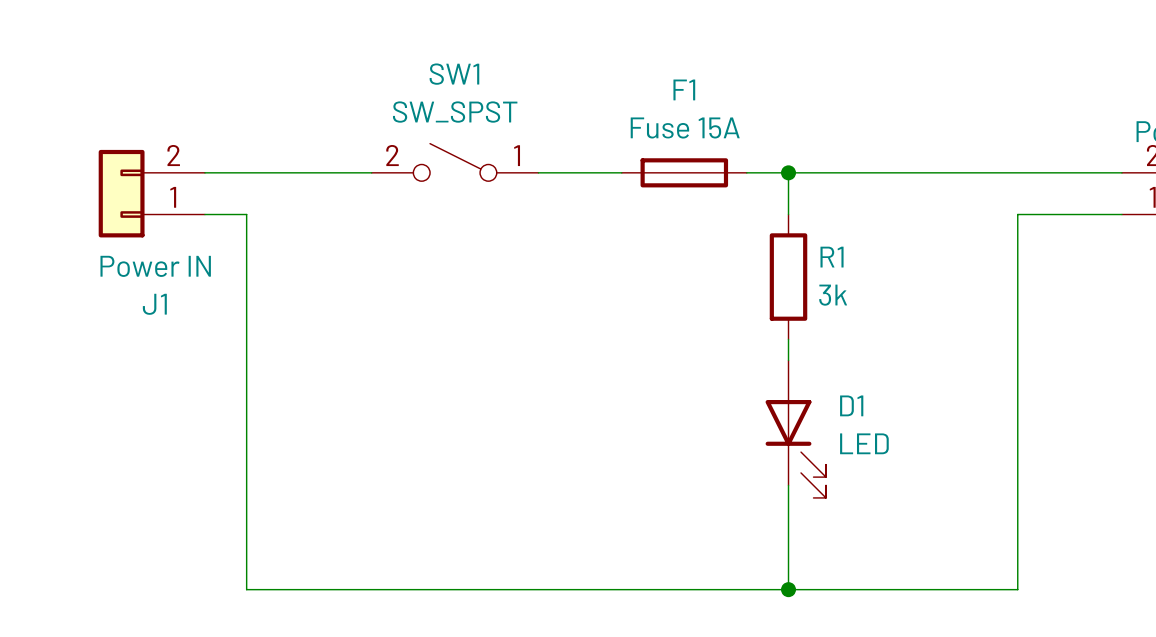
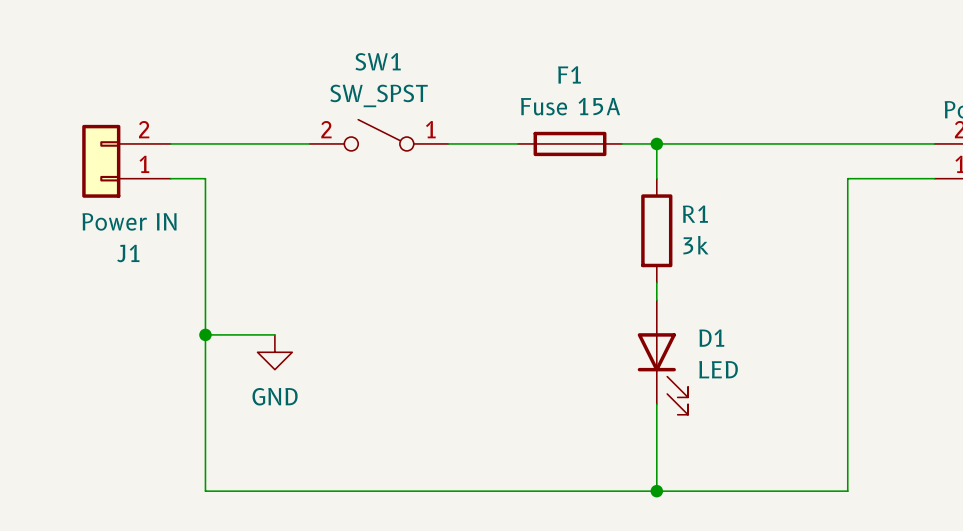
wire: none -> (205, 334) (274, 334)
junction: none -> (205, 334)
power symbol: none -> GND (274, 352)

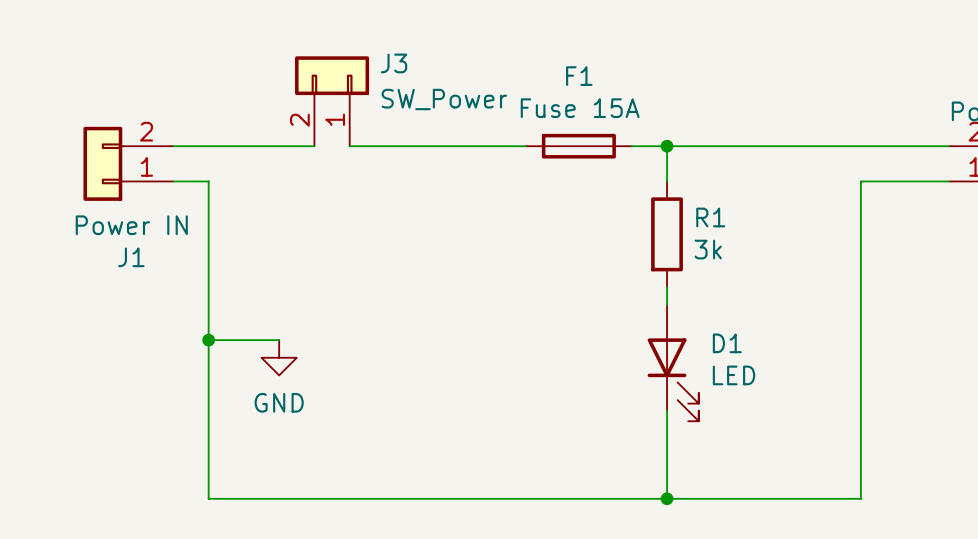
J3: none -> SW_Power (332, 101)
SW1: SW_SPST (379, 135) -> none
wire: none -> (349, 146) (455, 146)

